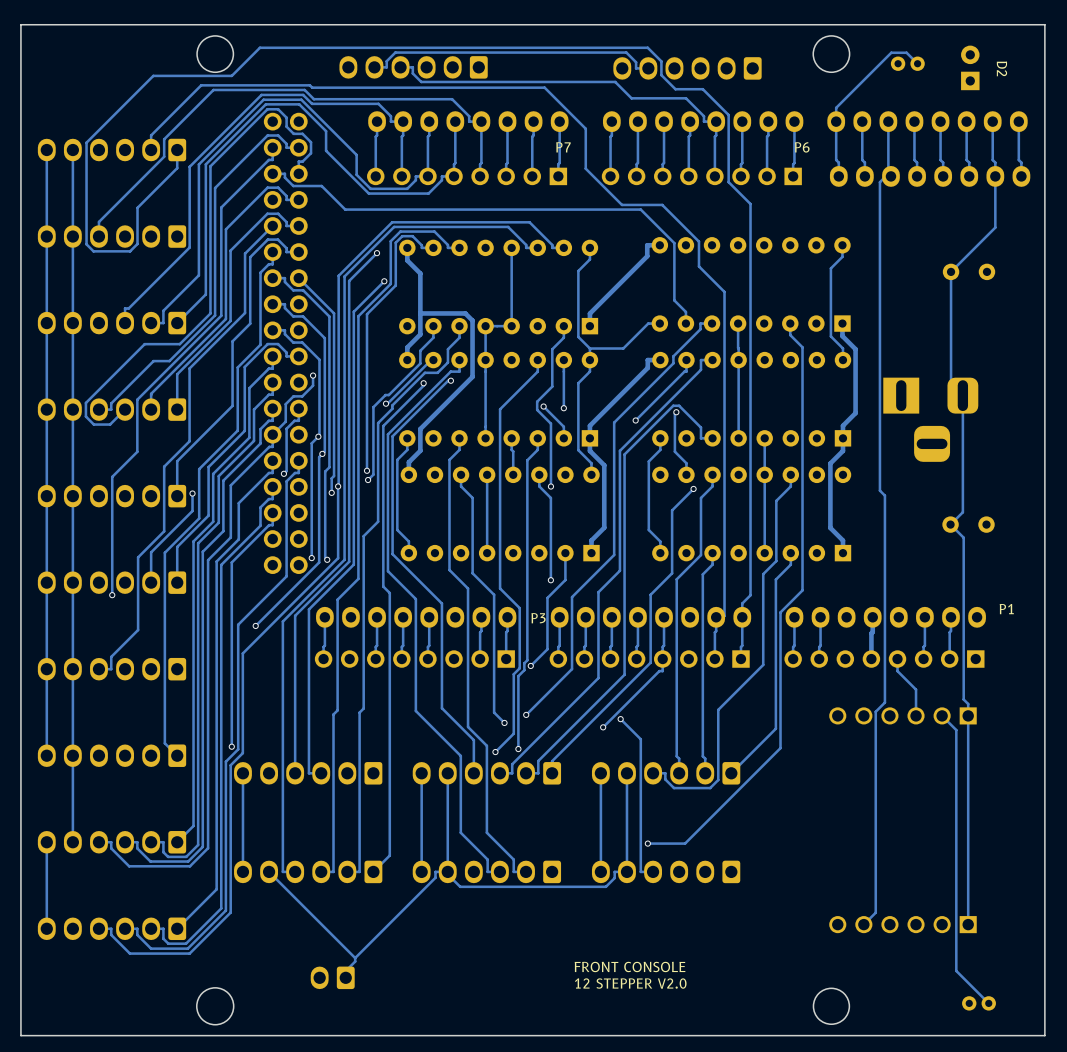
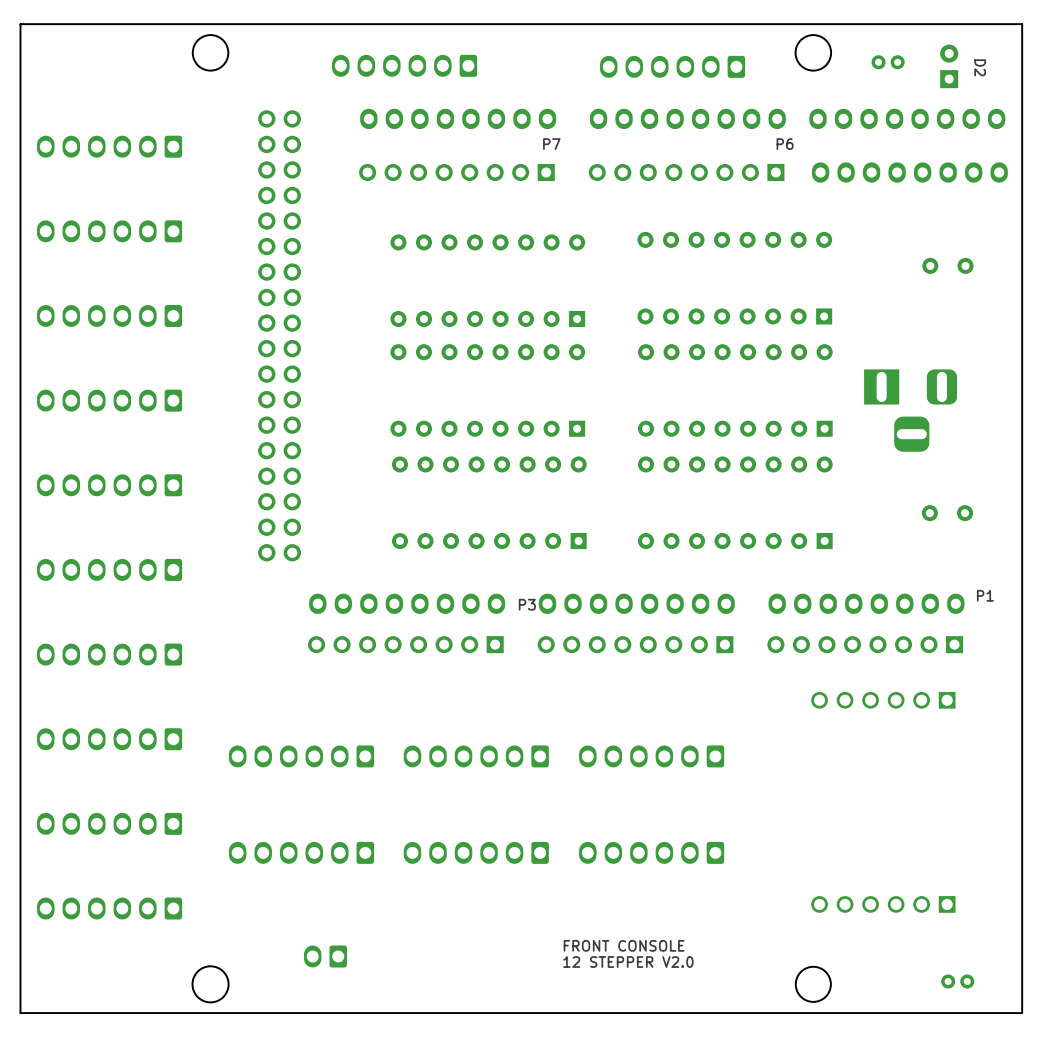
track: (917, 63) (906, 52) (891, 52) (836, 107) (836, 160) (838, 162) (838, 176) -> none
track: (374, 67) (386, 67) (386, 61) (395, 52) (626, 52) (636, 62) (636, 68) (648, 68) -> none
track: (400, 67) (412, 67) (412, 73) (421, 81) (615, 81) (631, 98) (686, 98) (703, 116) (703, 121) (716, 121) (714, 176) -> none
track: (377, 121) (375, 176) -> none
track: (429, 121) (427, 176) (415, 176) (415, 180) (407, 188) (370, 188) (356, 174) (356, 154) (301, 99) (263, 99) (198, 164) (198, 275) (163, 310) (163, 323) (151, 323) -> none
track: (455, 121) (454, 176) (441, 176) (441, 180) (428, 193) (368, 193) (326, 150) (326, 131) (299, 104) (265, 104) (205, 164) (205, 294) (177, 323) -> none
track: (507, 121) (506, 176) -> none
track: (533, 121) (532, 176) -> none
track: (559, 121) (558, 176) -> none
track: (611, 121) (610, 176) -> none
track: (637, 121) (636, 176) -> none
track: (664, 121) (662, 176) -> none
track: (690, 121) (688, 176) -> none
track: (742, 121) (740, 176) -> none
track: (768, 121) (767, 176) -> none
track: (794, 121) (793, 176) -> none
track: (862, 121) (862, 160) (864, 162) (864, 176) -> none
track: (888, 121) (888, 173) (879, 182) (879, 490) (884, 495) (884, 702) (875, 711) (875, 912) (863, 924) -> none
track: (914, 121) (914, 160) (917, 162) (917, 176) -> none
track: (940, 121) (940, 160) (943, 162) (943, 176) -> none
track: (966, 121) (966, 160) (969, 162) (969, 176) -> none
track: (992, 121) (992, 160) (995, 162) (995, 227) (951, 271) (951, 383) (962, 395) (962, 512) (950, 524) (963, 537) (963, 699) (968, 704) (968, 924) -> none
track: (1018, 121) (1018, 160) (1021, 162) (1021, 176) -> none
track: (272, 147) (272, 159) (268, 159) (221, 207) (221, 315) (137, 399) (137, 451) (112, 476) (112, 595) -> none
track: (298, 147) (286, 147) (286, 143) (278, 135) (267, 135) (215, 188) (215, 315) (169, 361) (153, 361) (111, 403) (111, 409) (98, 409) -> none
track: (46, 150) (46, 755) -> none
track: (72, 150) (72, 842) -> none
track: (151, 150) (151, 135) (201, 85) (309, 85) (312, 87) (544, 87) (585, 128) (585, 168) (622, 204) (662, 204) (698, 241) (698, 266) (724, 291) (724, 615) (716, 624) -> none
track: (177, 150) (177, 168) (137, 207) (137, 243) (130, 251) (93, 251) (86, 244) (86, 142) (153, 75) (231, 75) (259, 47) (647, 47) (661, 61) (661, 75) (675, 89) (702, 89) (728, 115) (728, 182) (750, 204) (750, 595) (742, 603) (740, 659) -> none
track: (272, 173) (284, 173) (284, 177) (293, 186) (321, 186) (345, 209) (640, 209) (674, 243) (674, 300) (685, 311) (685, 323) -> none
track: (298, 173) (298, 161) (302, 161) (311, 153) (311, 142) (302, 133) (293, 133) (286, 126) (286, 117) (278, 109) (267, 109) (210, 166) (210, 313) (179, 344) (144, 344) (85, 402) (85, 416) (93, 424) (110, 424) (125, 409) -> none
track: (401, 176) (403, 121) (390, 121) (390, 116) (378, 103) (312, 103) (303, 94) (261, 94) (189, 166) (189, 247) (128, 308) (125, 308) (125, 323) -> none
track: (480, 176) (481, 121) (469, 121) (469, 116) (452, 99) (313, 99) (304, 89) (213, 89) (164, 139) (164, 156) (98, 221) (98, 236) -> none
track: (298, 199) (286, 199) (286, 196) (278, 187) (267, 187) (225, 229) (225, 319) (151, 393) (151, 409) -> none
track: (272, 225) (245, 253) (245, 313) (189, 368) (189, 441) (164, 466) (164, 531) (138, 557) (138, 630) (111, 656) (111, 669) (98, 669) -> none
track: (298, 225) (286, 225) (286, 222) (278, 213) (267, 213) (230, 250) (230, 320) (177, 374) (177, 409) -> none
track: (659, 245) (647, 245) (647, 256) (589, 313) (589, 326) -> none
track: (842, 245) (842, 256) (830, 268) (830, 336) (842, 348) (842, 360) -> none
track: (407, 247) (407, 260) (420, 273) (420, 334) (407, 347) (407, 360) -> none
track: (433, 247) (421, 247) (421, 245) (412, 236) (402, 236) (395, 242) (395, 285) (367, 314) (367, 470) -> none
track: (459, 247) (447, 247) (447, 245) (434, 231) (400, 231) (390, 241) (390, 283) (358, 316) (358, 578) (337, 599) (337, 710) (333, 714) (333, 871) (321, 871) -> none
track: (511, 247) (511, 326) (485, 326) (485, 438) -> none
track: (537, 247) (526, 247) (526, 245) (508, 226) (394, 226) (344, 276) (344, 559) (282, 621) (282, 871) (295, 871) -> none
track: (563, 247) (552, 247) (552, 245) (529, 222) (392, 222) (338, 275) (338, 558) (242, 653) (242, 753) (230, 765) (230, 912) (189, 953) (129, 953) (111, 934) (111, 928) (98, 928) -> none
track: (589, 247) (589, 259) (578, 271) (578, 336) (589, 348) -> none
track: (272, 252) (272, 264) (268, 264) (260, 272) (260, 344) (237, 367) (237, 430) (199, 469) (199, 518) (164, 552) (164, 743) (177, 755) -> none
track: (298, 252) (286, 252) (286, 248) (277, 239) (267, 239) (250, 257) (250, 323) (232, 341) (232, 405) (177, 461) (177, 496) -> none
track: (377, 253) (349, 280) (349, 561) (295, 615) (295, 773) -> none
via: (377, 253) -> none
track: (272, 278) (284, 278) (284, 281) (293, 290) (303, 290) (329, 316) (329, 467) (325, 471) (325, 557) (327, 559) -> none
track: (298, 278) (334, 313) (334, 476) (331, 478) (331, 492) -> none
track: (384, 281) (353, 311) (353, 564) (308, 609) (308, 773) (321, 773) -> none
via: (384, 281) -> none
track: (272, 304) (284, 304) (284, 308) (293, 316) (303, 316) (324, 338) (324, 451) (319, 457) (319, 562) (255, 625) -> none
track: (420, 313) (465, 313) (472, 320) (472, 376) (420, 429) (420, 450) (408, 462) (408, 474) -> none
track: (659, 323) (648, 323) (623, 348) (589, 348) -> none
track: (712, 323) (700, 323) (700, 329) (673, 356) (673, 363) (614, 422) (614, 554) (572, 597) (572, 669) (526, 714) -> none
track: (738, 323) (738, 438) -> none
track: (790, 323) (790, 335) (802, 347) (802, 590) (780, 612) (780, 748) (685, 843) (647, 843) -> none
track: (842, 323) (842, 336) (855, 349) (855, 413) (842, 425) (842, 450) (830, 463) (830, 527) (842, 540) (842, 553) -> none
track: (433, 326) (433, 337) (420, 350) (420, 363) (388, 395) (385, 395) (373, 407) (373, 474) (368, 480) -> none
track: (459, 326) (459, 337) (447, 349) (447, 362) (437, 372) (424, 372) (392, 405) (392, 408) (378, 423) (378, 521) (363, 536) (363, 708) (359, 712) (359, 871) (347, 871) -> none
track: (563, 326) (563, 337) (552, 349) (552, 386) (537, 401) (537, 409) (550, 423) (550, 486) -> none
track: (272, 330) (284, 330) (284, 334) (293, 342) (302, 342) (319, 359) (319, 435) (311, 443) (311, 558) -> none
track: (589, 348) (589, 371) (578, 383) (578, 450) (591, 463) (591, 474) -> none
track: (272, 356) (272, 368) (268, 368) (249, 388) (249, 437) (213, 473) (213, 521) (193, 541) (193, 825) (177, 842) -> none
track: (298, 356) (286, 356) (286, 352) (278, 344) (267, 344) (244, 367) (244, 430) (208, 467) (208, 515) (177, 546) (177, 582) -> none
track: (433, 360) (431, 360) (385, 403) -> none
track: (459, 360) (459, 371) (450, 371) (387, 434) (387, 571) (415, 599) (415, 711) (460, 755) (460, 832) (487, 859) (487, 871) (499, 871) -> none
track: (537, 360) (537, 371) (500, 409) (500, 588) (519, 608) (519, 668) (513, 674) (513, 733) (495, 752) -> none
track: (563, 360) (563, 408) -> none
track: (660, 360) (647, 360) (647, 367) (589, 425) (589, 450) (604, 465) (604, 527) (591, 540) (591, 553) -> none
track: (686, 360) (686, 371) (635, 420) -> none
track: (712, 360) (700, 360) (700, 369) (619, 450) (619, 570) (598, 592) (598, 678) (512, 764) (512, 773) (499, 773) -> none
track: (313, 375) (313, 385) (302, 396) (293, 396) (285, 404) (285, 421) (272, 434) (272, 446) (269, 446) (230, 485) (230, 537) (208, 560) (208, 848) (189, 866) (129, 866) (111, 848) (111, 842) (98, 842) -> none
via: (313, 375) -> none
track: (450, 380) (448, 380) (392, 436) (392, 554) (441, 603) (441, 708) (473, 740) (473, 773) -> none
via: (450, 380) -> none
track: (272, 382) (272, 394) (268, 394) (254, 409) (254, 440) (218, 476) (218, 522) (198, 543) (198, 844) (186, 856) (168, 856) (163, 852) (163, 842) (151, 842) -> none
track: (423, 383) (423, 385) (383, 426) (383, 586) (389, 593) (389, 855) (373, 871) -> none
via: (423, 383) -> none
via: (385, 403) -> none
track: (543, 406) (563, 426) (563, 438) -> none
via: (543, 406) -> none
track: (272, 408) (272, 420) (268, 420) (260, 429) (260, 443) (223, 480) (223, 531) (202, 551) (202, 846) (188, 861) (150, 861) (137, 848) (137, 842) (125, 842) -> none
track: (298, 408) (298, 420) (294, 420) (286, 428) (286, 471) (283, 473) -> none
via: (563, 408) -> none
track: (676, 412) (674, 451) (686, 463) (686, 474) -> none
via: (676, 412) -> none
via: (635, 420) -> none
via: (318, 436) -> none
track: (407, 438) (407, 449) (397, 459) (397, 530) (408, 541) (408, 553) -> none
track: (459, 438) (459, 449) (449, 459) (449, 570) (468, 588) (468, 726) (486, 745) (486, 832) (513, 859) (513, 871) (526, 871) -> none
track: (511, 438) (513, 474) -> none
track: (537, 438) (537, 449) (527, 460) (527, 660) (524, 663) (524, 670) (518, 676) (518, 749) -> none
track: (660, 438) (660, 449) (648, 461) (648, 530) (660, 541) (660, 553) -> none
track: (712, 438) (700, 438) (700, 427) (679, 405) (673, 405) (624, 454) (624, 674) (538, 761) (538, 773) (526, 773) -> none
track: (764, 438) (764, 553) -> none
via: (322, 453) -> none
track: (272, 460) (272, 472) (268, 472) (238, 503) (238, 539) (216, 561) (216, 889) (177, 928) -> none
track: (298, 460) (298, 472) (294, 472) (286, 481) (286, 576) (238, 624) (238, 749) (225, 761) (225, 910) (187, 948) (151, 948) (137, 934) (137, 928) (125, 928) -> none
via: (367, 470) -> none
via: (283, 473) -> none
track: (461, 474) (461, 486) (472, 497) (472, 573) (494, 594) (494, 712) (504, 722) -> none
track: (487, 474) (487, 553) -> none
track: (539, 474) (539, 486) (550, 497) (550, 580) -> none
track: (712, 474) (712, 486) (700, 497) (700, 555) (676, 579) (676, 756) (679, 758) (679, 773) -> none
track: (790, 474) (790, 486) (776, 500) (776, 561) (763, 574) (763, 664) (718, 709) (718, 780) (710, 788) (673, 788) (665, 779) (665, 773) (653, 773) -> none
via: (368, 480) -> none
track: (272, 486) (272, 499) (268, 499) (260, 507) (260, 525) (221, 564) (221, 908) (186, 943) (168, 943) (163, 938) (163, 928) (151, 928) -> none
via: (338, 486) -> none
via: (550, 486) -> none
track: (693, 488) (672, 510) (672, 573) (650, 594) (650, 662) (552, 761) (552, 773) -> none
via: (693, 488) -> none
via: (331, 492) -> none
track: (192, 493) (192, 510) (151, 552) (151, 582) -> none
via: (192, 493) -> none
track: (272, 512) (272, 525) (269, 525) (231, 562) (231, 746) -> none
track: (565, 553) (565, 580) (547, 597) (547, 649) (530, 665) -> none
track: (712, 553) (712, 564) (702, 574) (702, 756) (705, 758) (705, 773) -> none
track: (790, 553) (790, 564) (775, 579) (775, 728) (731, 773) -> none
via: (311, 558) -> none
via: (327, 559) -> none
via: (550, 580) -> none
via: (112, 595) -> none
track: (324, 617) (323, 659) -> none
track: (377, 617) (375, 659) -> none
track: (403, 617) (401, 659) -> none
track: (429, 617) (427, 659) -> none
track: (481, 617) (480, 659) -> none
track: (507, 617) (506, 659) -> none
track: (559, 617) (558, 659) -> none
track: (585, 617) (584, 659) -> none
track: (611, 617) (610, 659) -> none
track: (637, 617) (636, 659) -> none
track: (664, 617) (662, 671) (659, 671) (603, 727) -> none
track: (716, 617) (714, 659) -> none
track: (794, 617) (793, 659) -> none
track: (820, 617) (819, 659) -> none
track: (872, 617) (871, 659) -> none
track: (924, 617) (923, 659) -> none
track: (950, 617) (949, 659) -> none
via: (255, 625) -> none
track: (897, 659) (897, 671) (916, 689) (916, 715) -> none
via: (530, 665) -> none
via: (526, 714) -> none
track: (942, 715) (956, 730) (956, 970) (988, 1003) -> none
track: (620, 719) (640, 739) (640, 871) (653, 871) -> none
via: (620, 719) -> none
via: (504, 722) -> none
via: (603, 727) -> none
via: (231, 746) -> none
via: (518, 749) -> none
via: (495, 752) -> none
track: (242, 773) (242, 871) -> none
track: (421, 773) (421, 871) -> none
track: (447, 773) (447, 871) (435, 871) (435, 877) (355, 958) -> none
track: (600, 773) (600, 871) -> none
track: (626, 773) (626, 871) (614, 871) (614, 878) (605, 886) (460, 886) (445, 871) -> none
track: (46, 842) (46, 928) -> none
via: (647, 843) -> none
track: (269, 871) (355, 958) -> none
track: (355, 958) (355, 961) (345, 971) (345, 977) -> none

